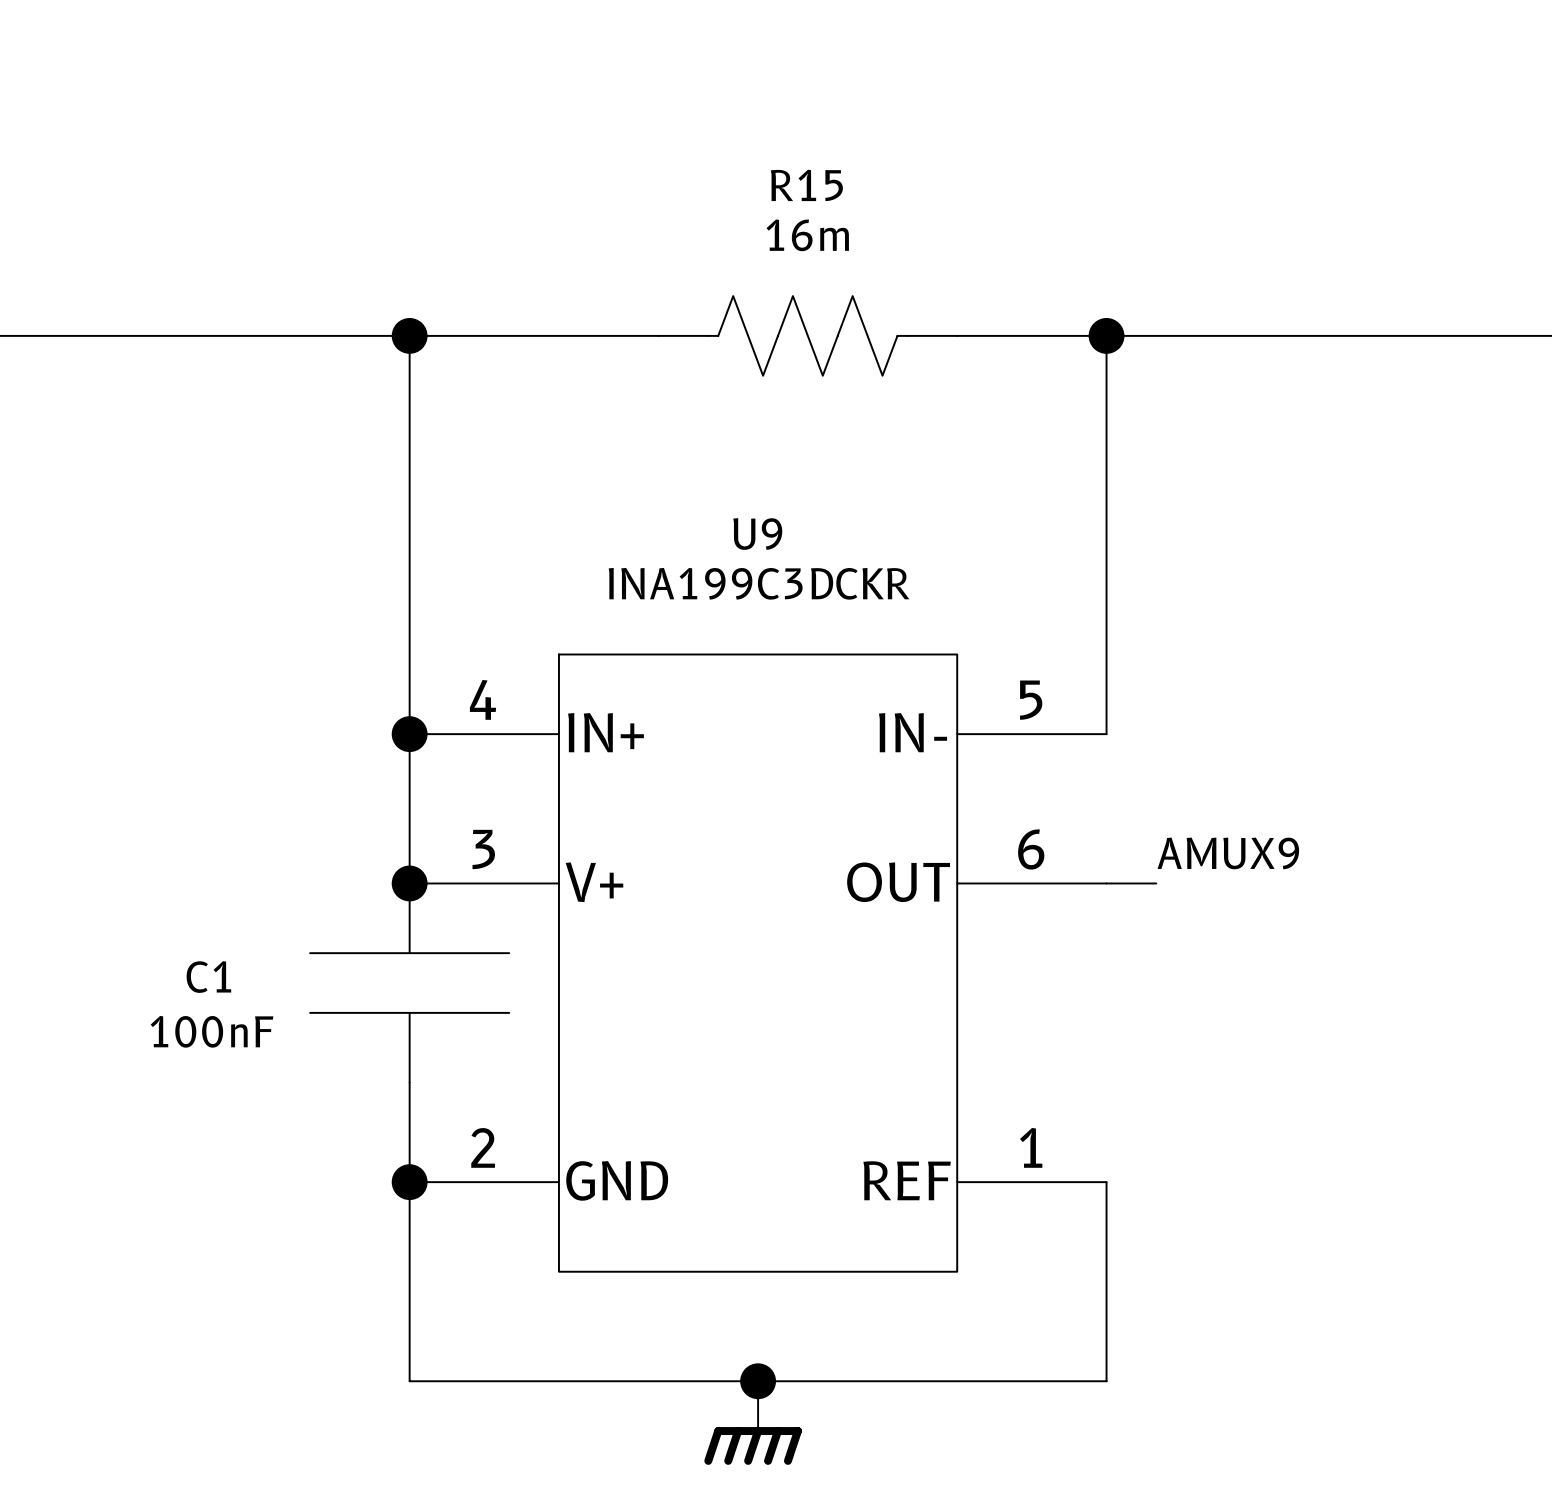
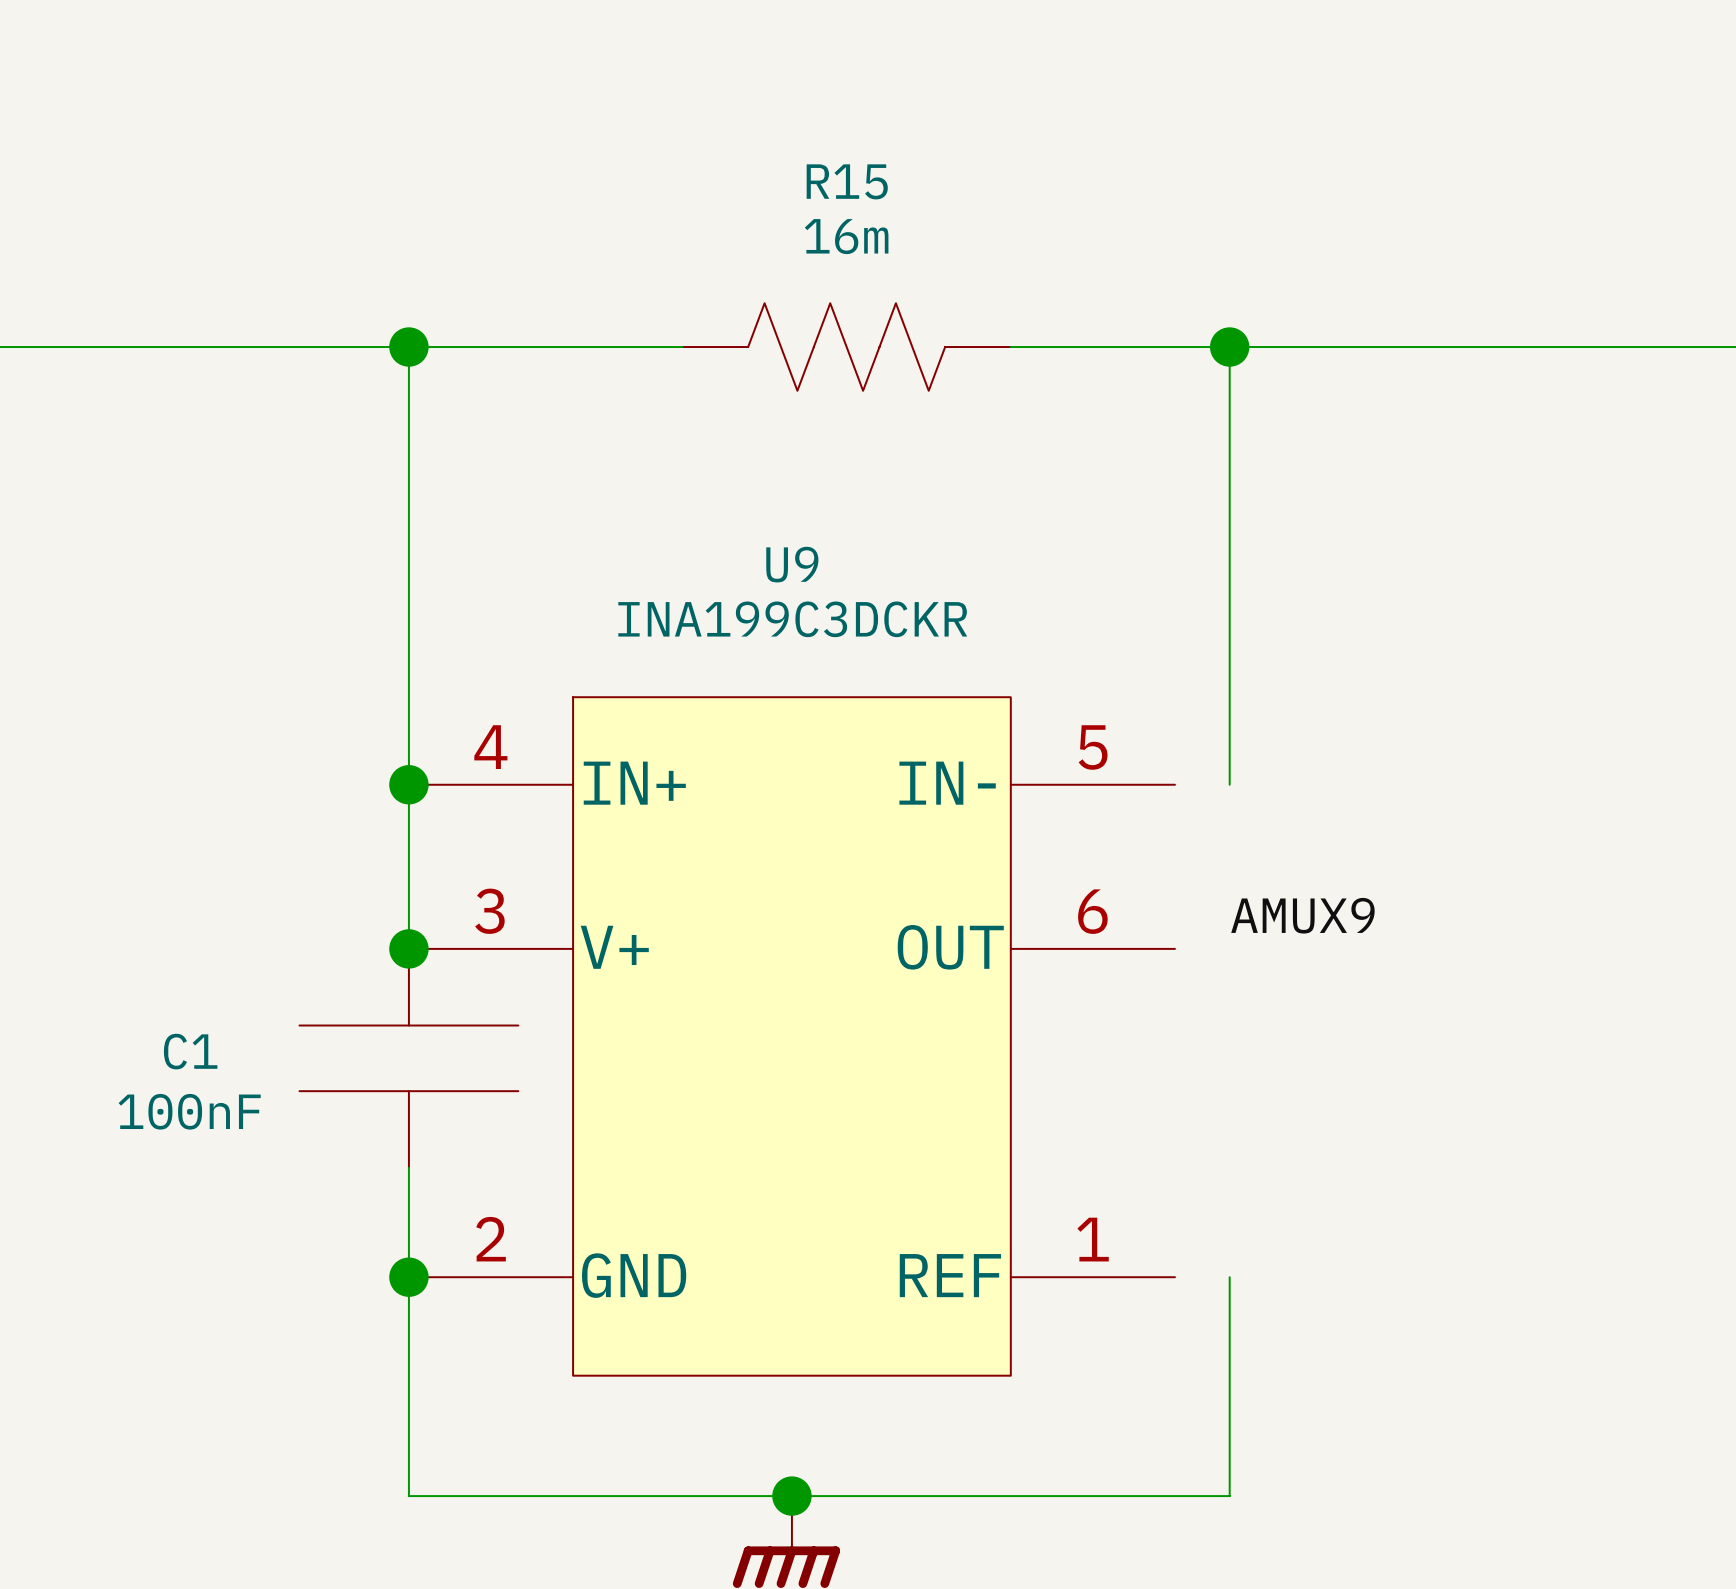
wire: (1106, 335) (1106, 734) -> (1229, 347) (1229, 784)
junction position: (1106, 335) -> (1229, 347)
wire: (1106, 883) (1156, 883) -> none
wire: (1106, 1182) (1106, 1381) -> (1229, 1277) (1229, 1496) (1174, 1496)

